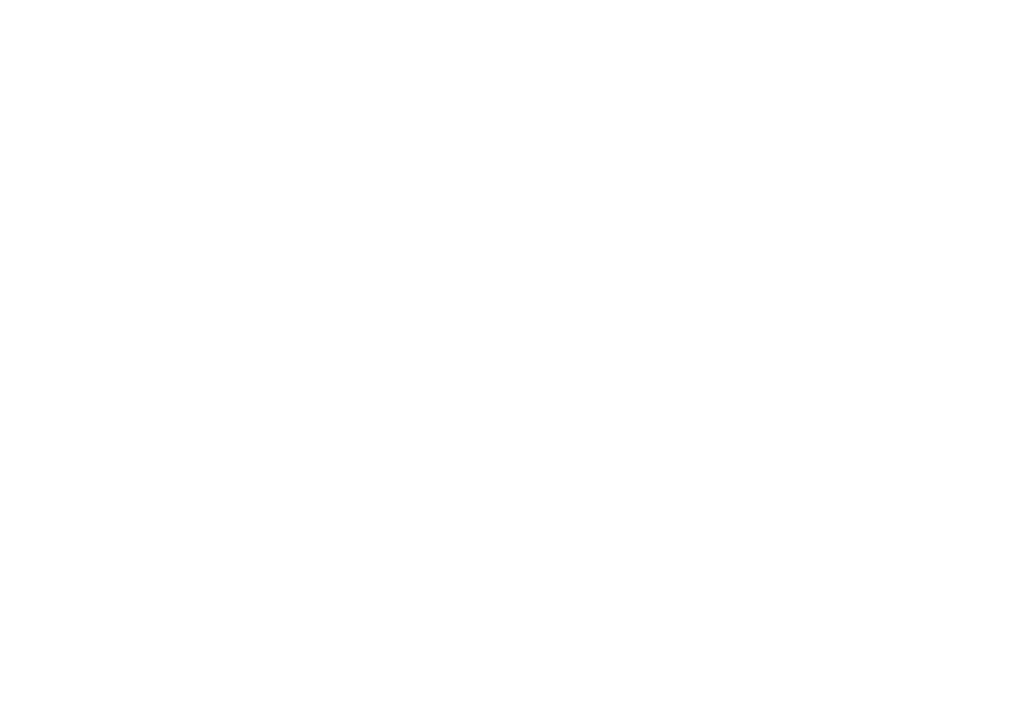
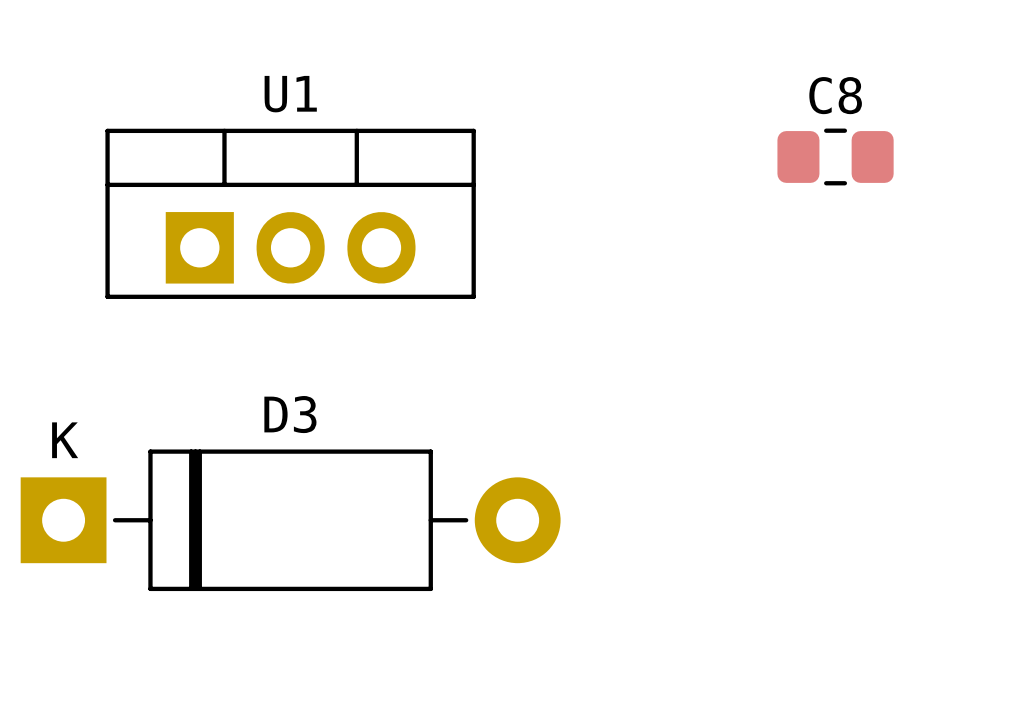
C8: none -> (835, 156)
U1: none -> (290, 213)
D3: none -> (290, 520)

